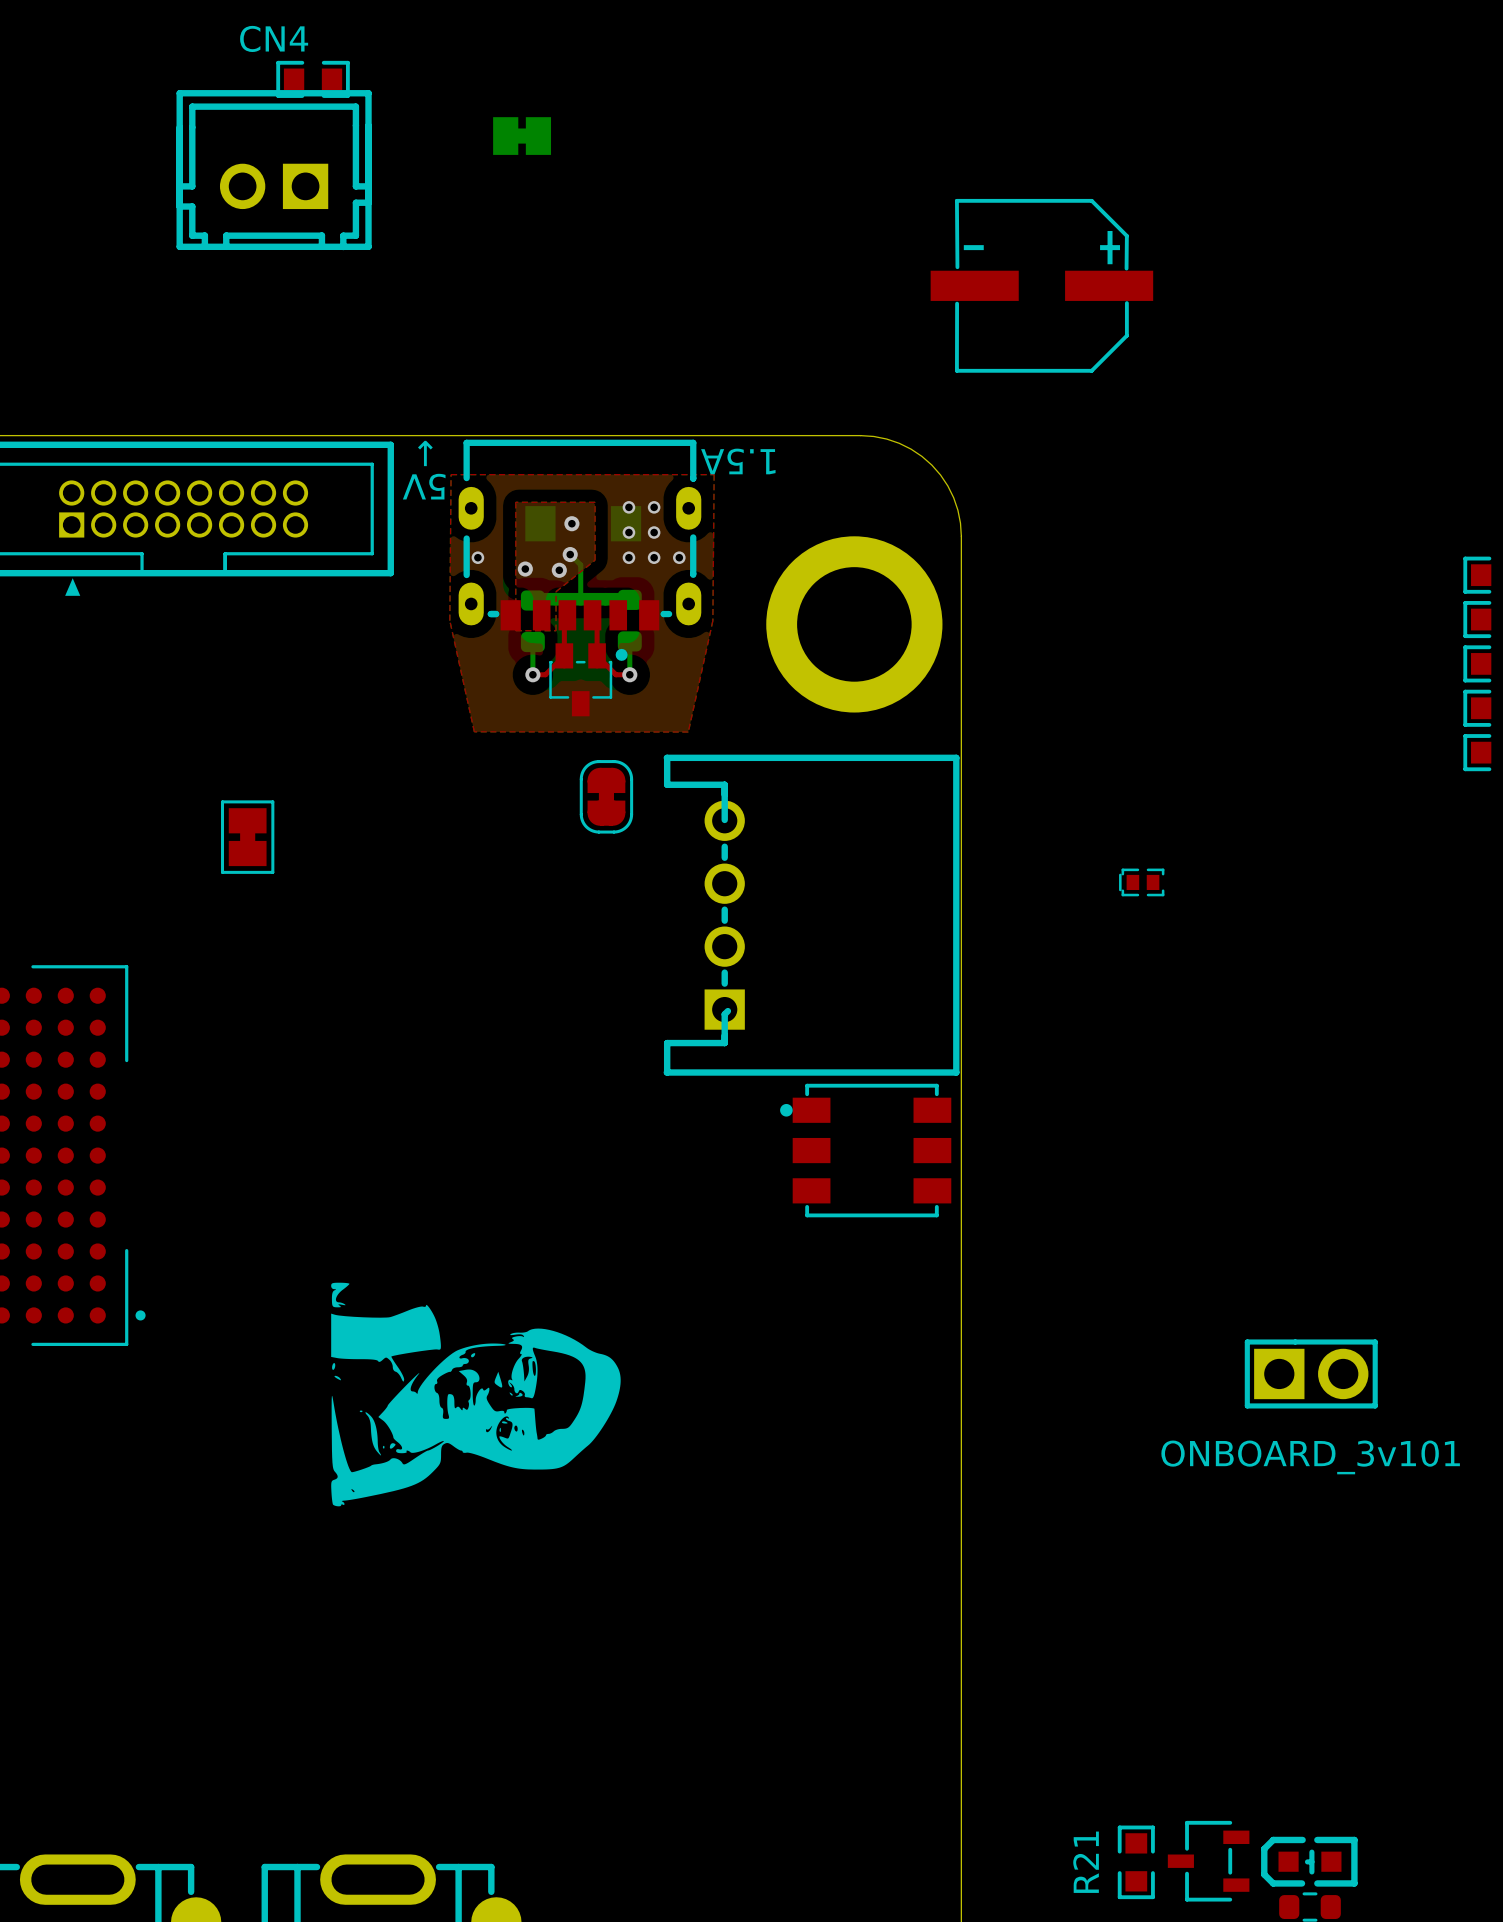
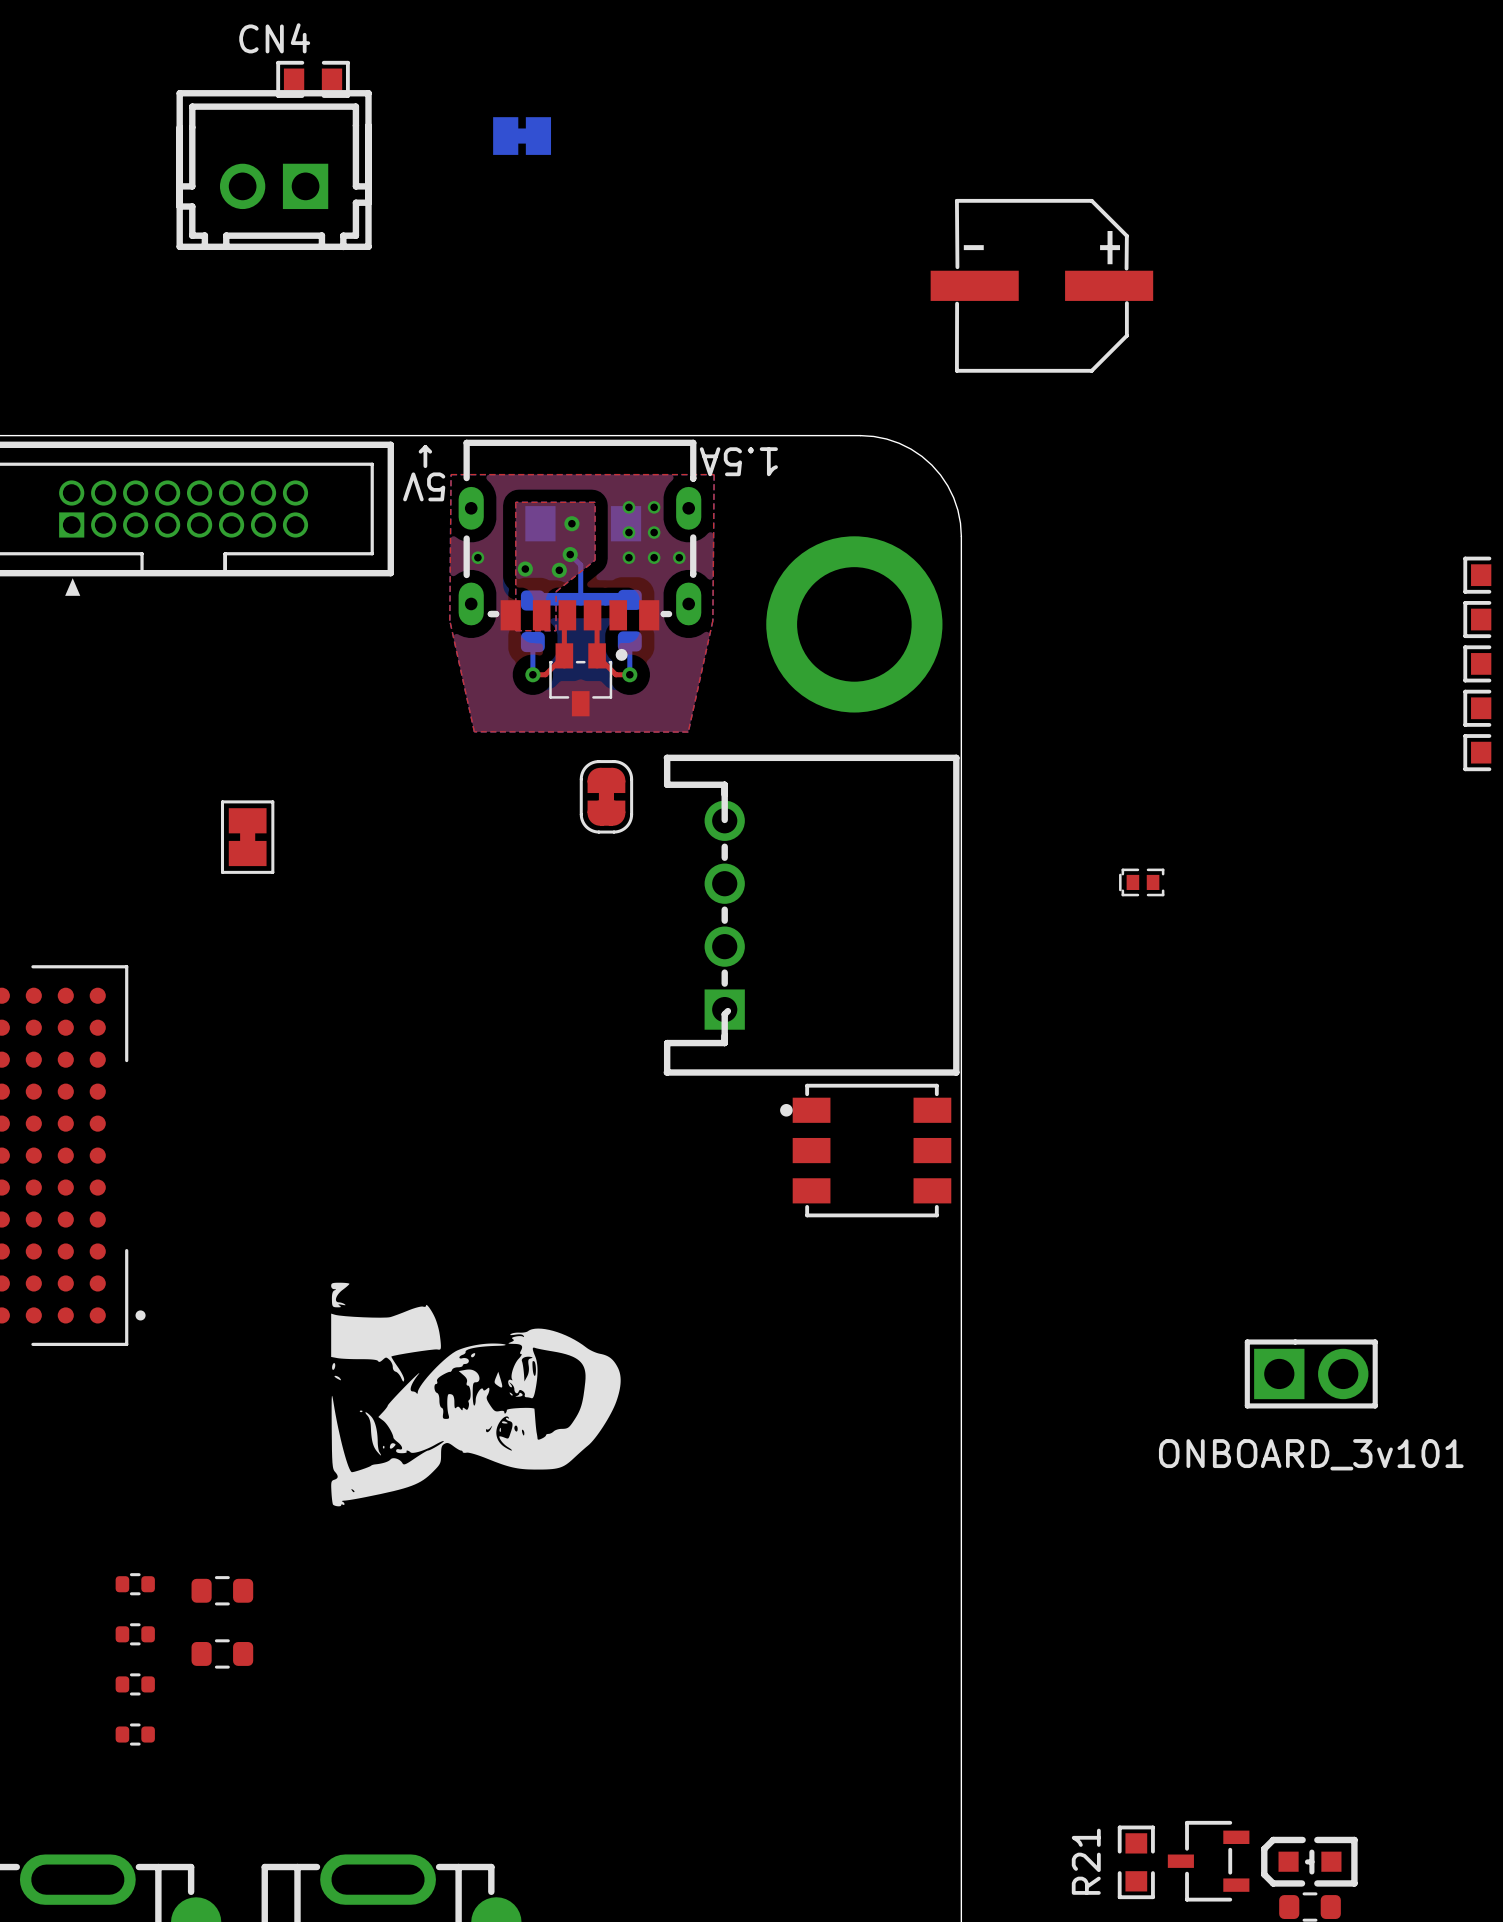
part: none -> (135, 1584)
part: none -> (222, 1590)
part: none -> (135, 1634)
part: none -> (222, 1653)
part: none -> (135, 1684)
part: none -> (135, 1734)

